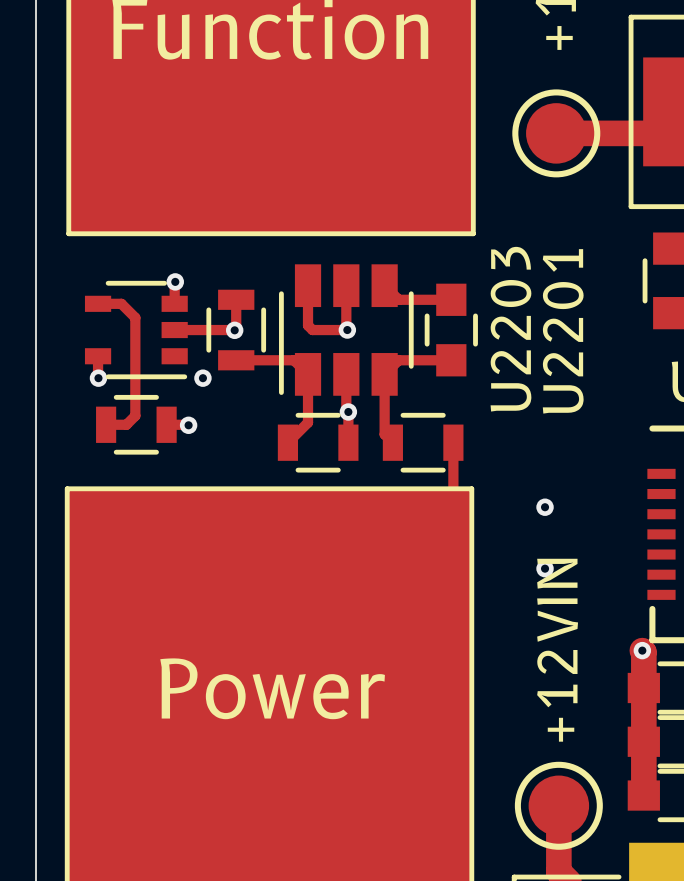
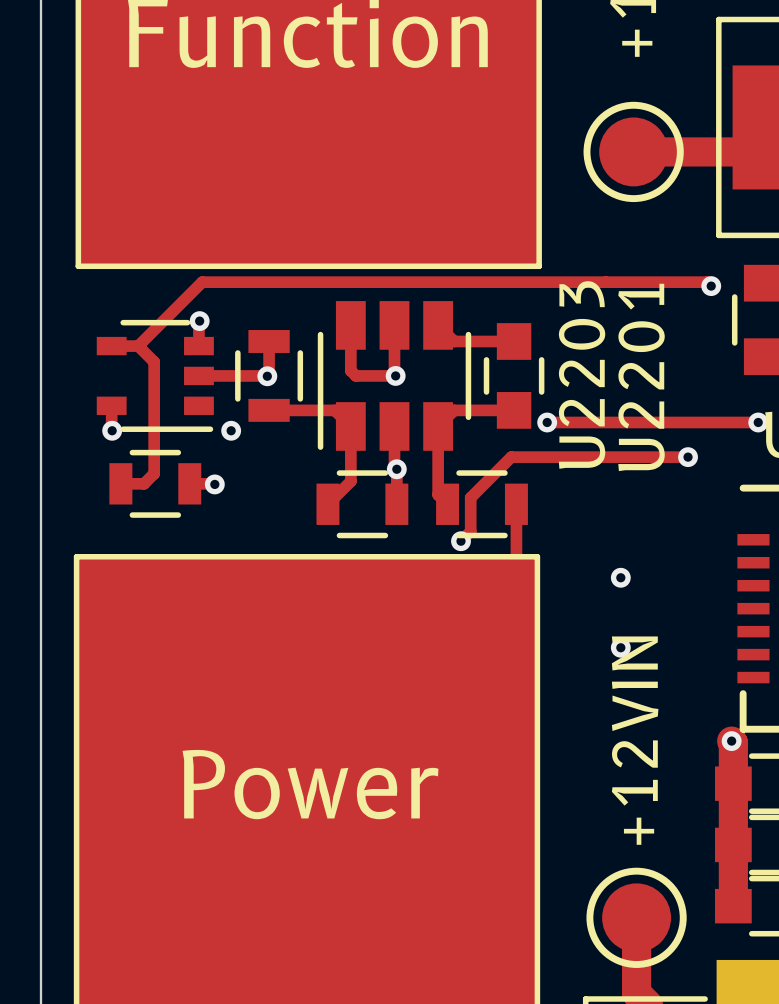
via: none -> (711, 286)
track: (121, 303) (135, 317) -> (711, 286) (707, 282) (202, 282) (138, 346) (154, 361)
track: none -> (547, 422) (758, 422)
via: none -> (547, 422)
via: none -> (758, 422)
track: none -> (688, 457) (511, 457) (470, 497) (470, 531) (461, 541)
via: none -> (688, 457)
via: none -> (461, 541)

